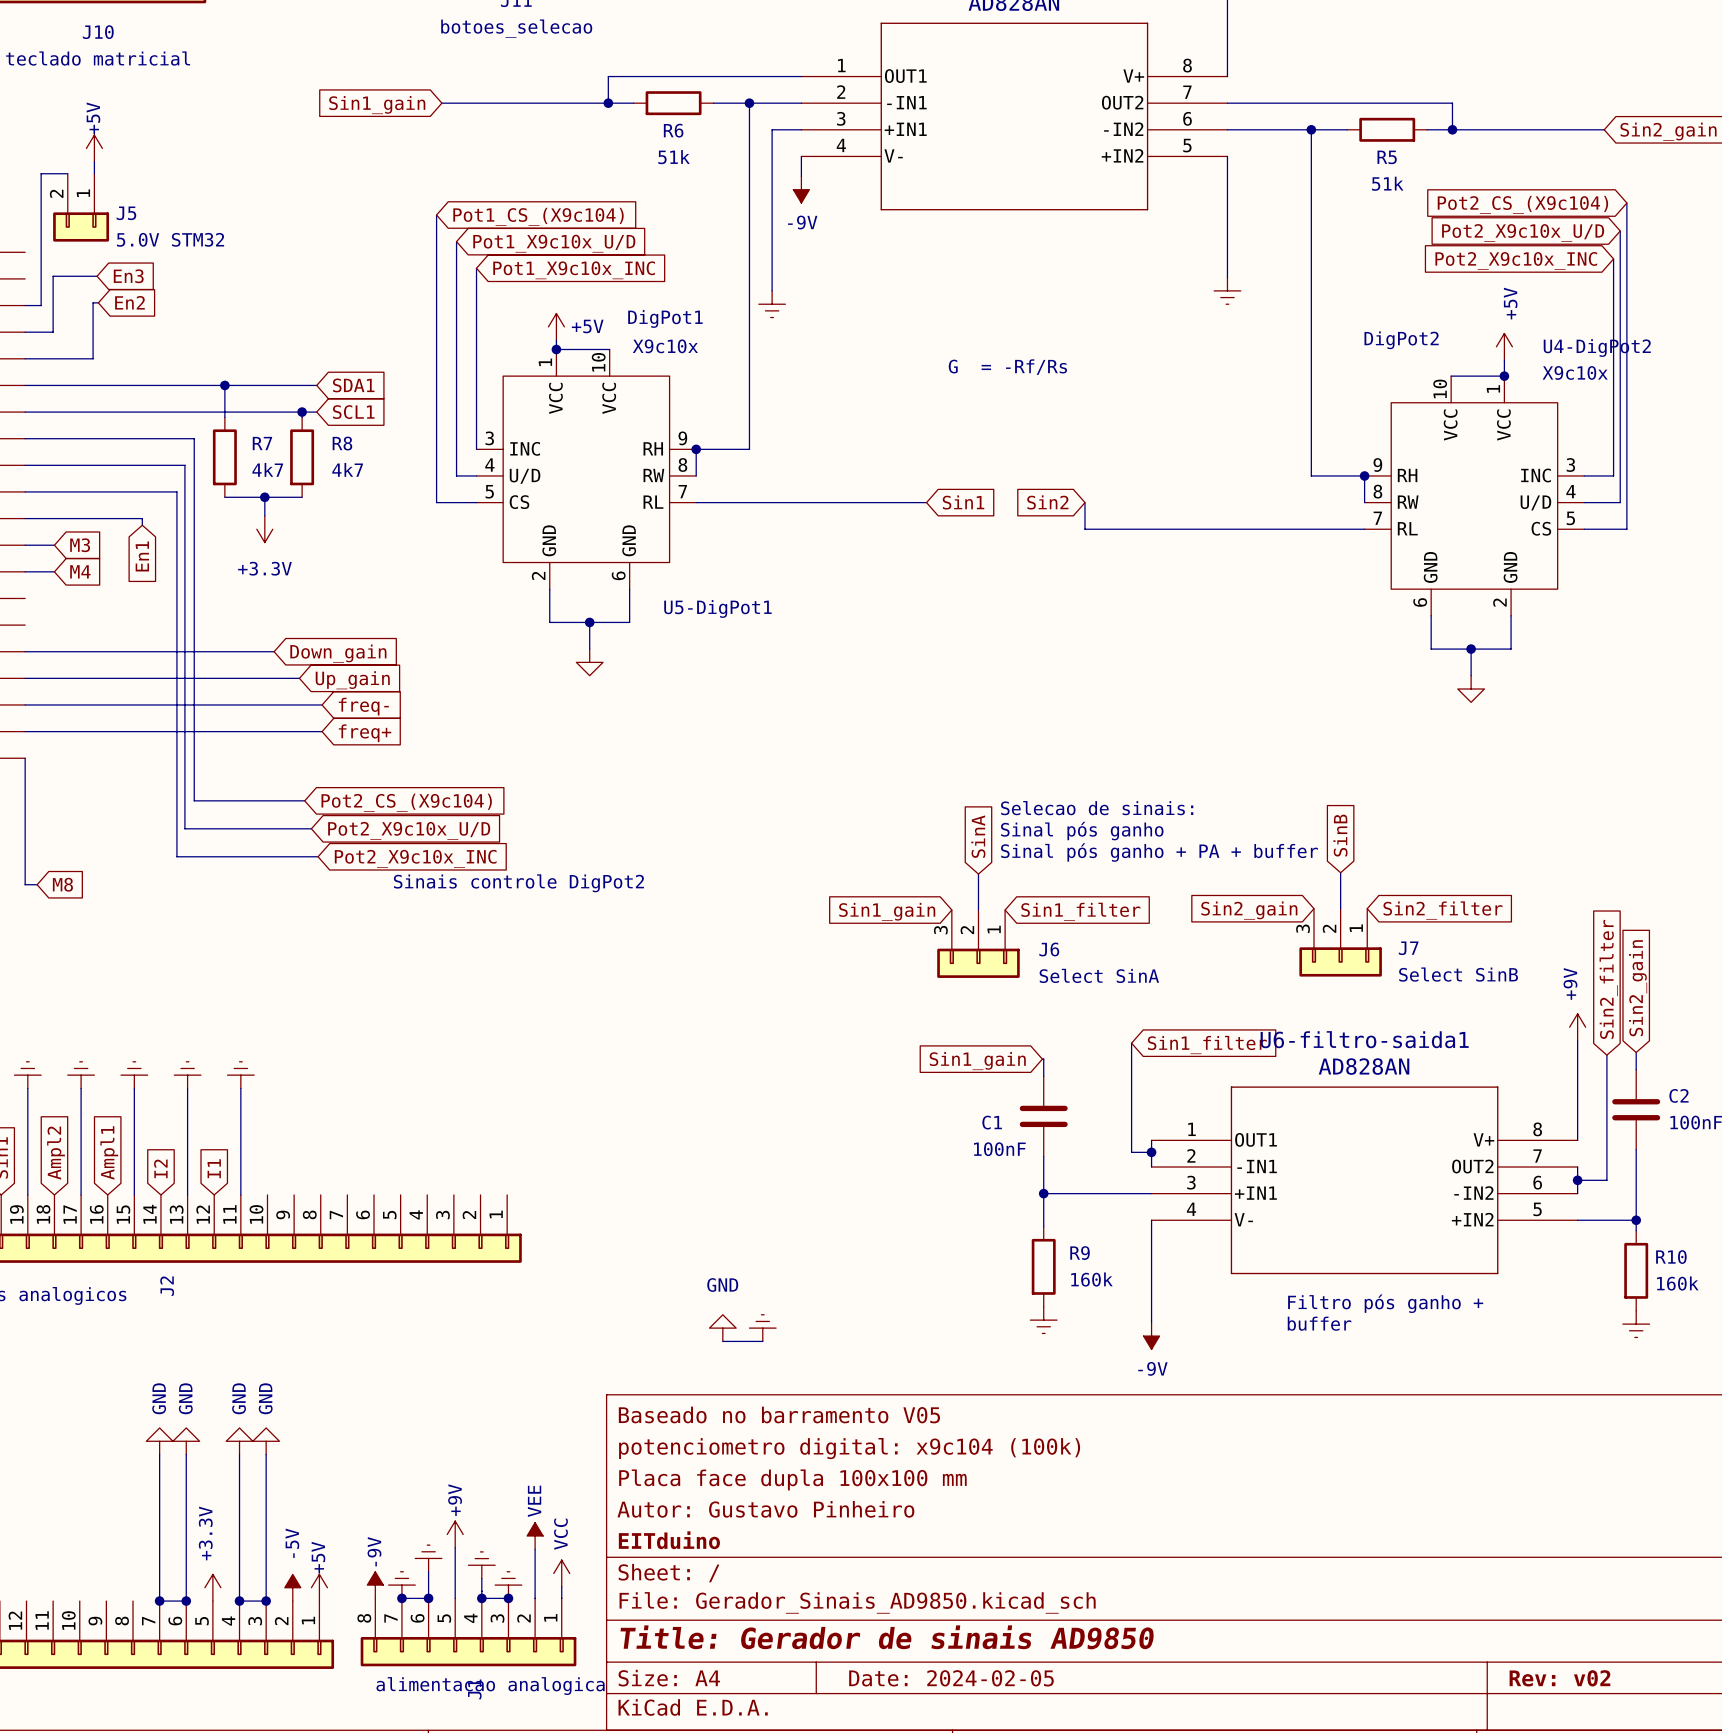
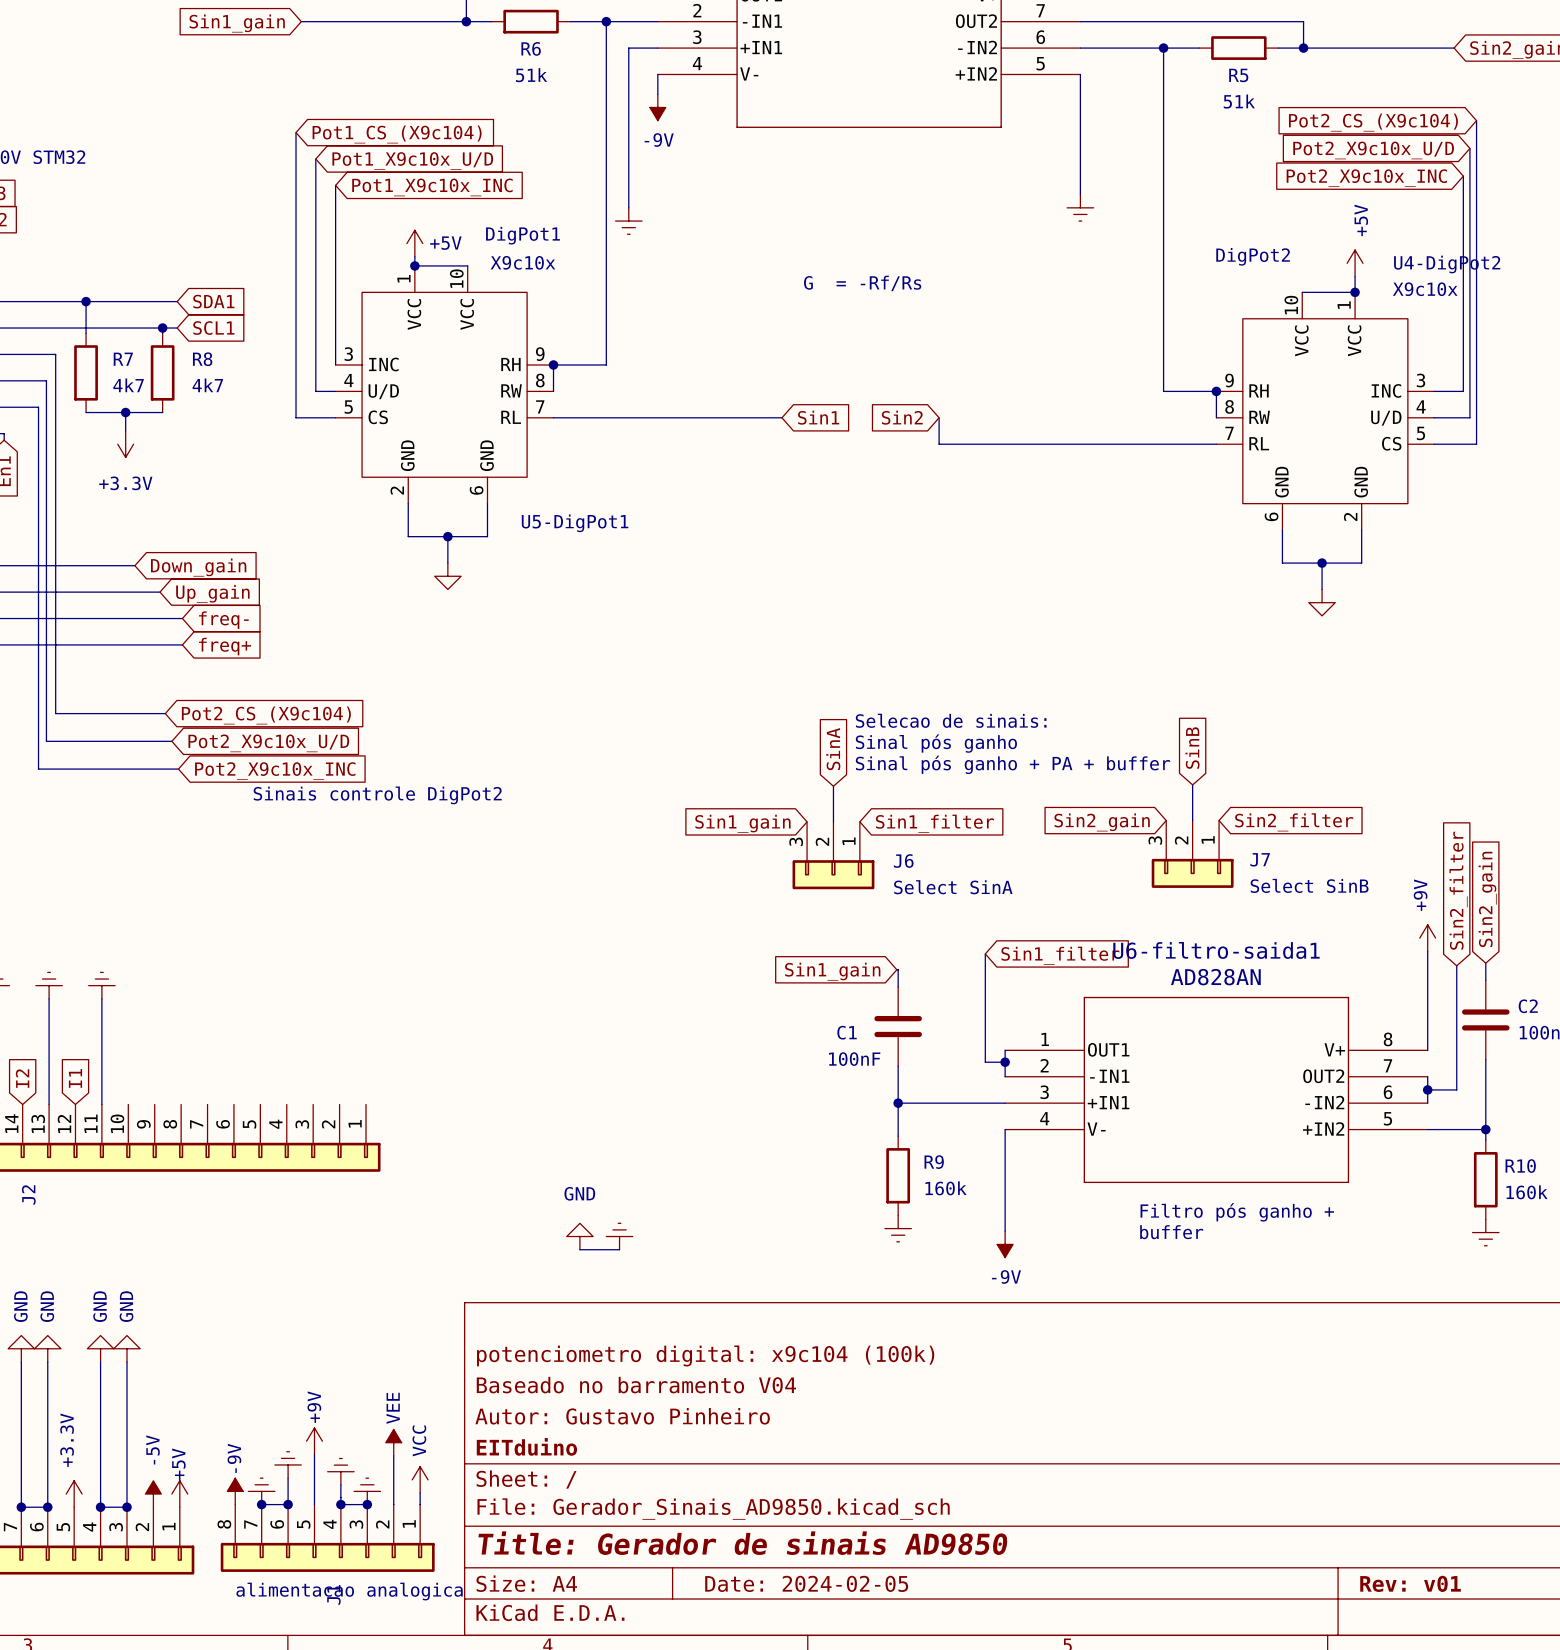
title block: Baseado no barramento V05 (779, 1414) -> none
title block: Placa face dupla 100x100 mm (792, 1479) -> Baseado no barramento V04 (636, 1385)
title block: Rev: v02 (1559, 1678) -> Rev: v01 (1410, 1583)

